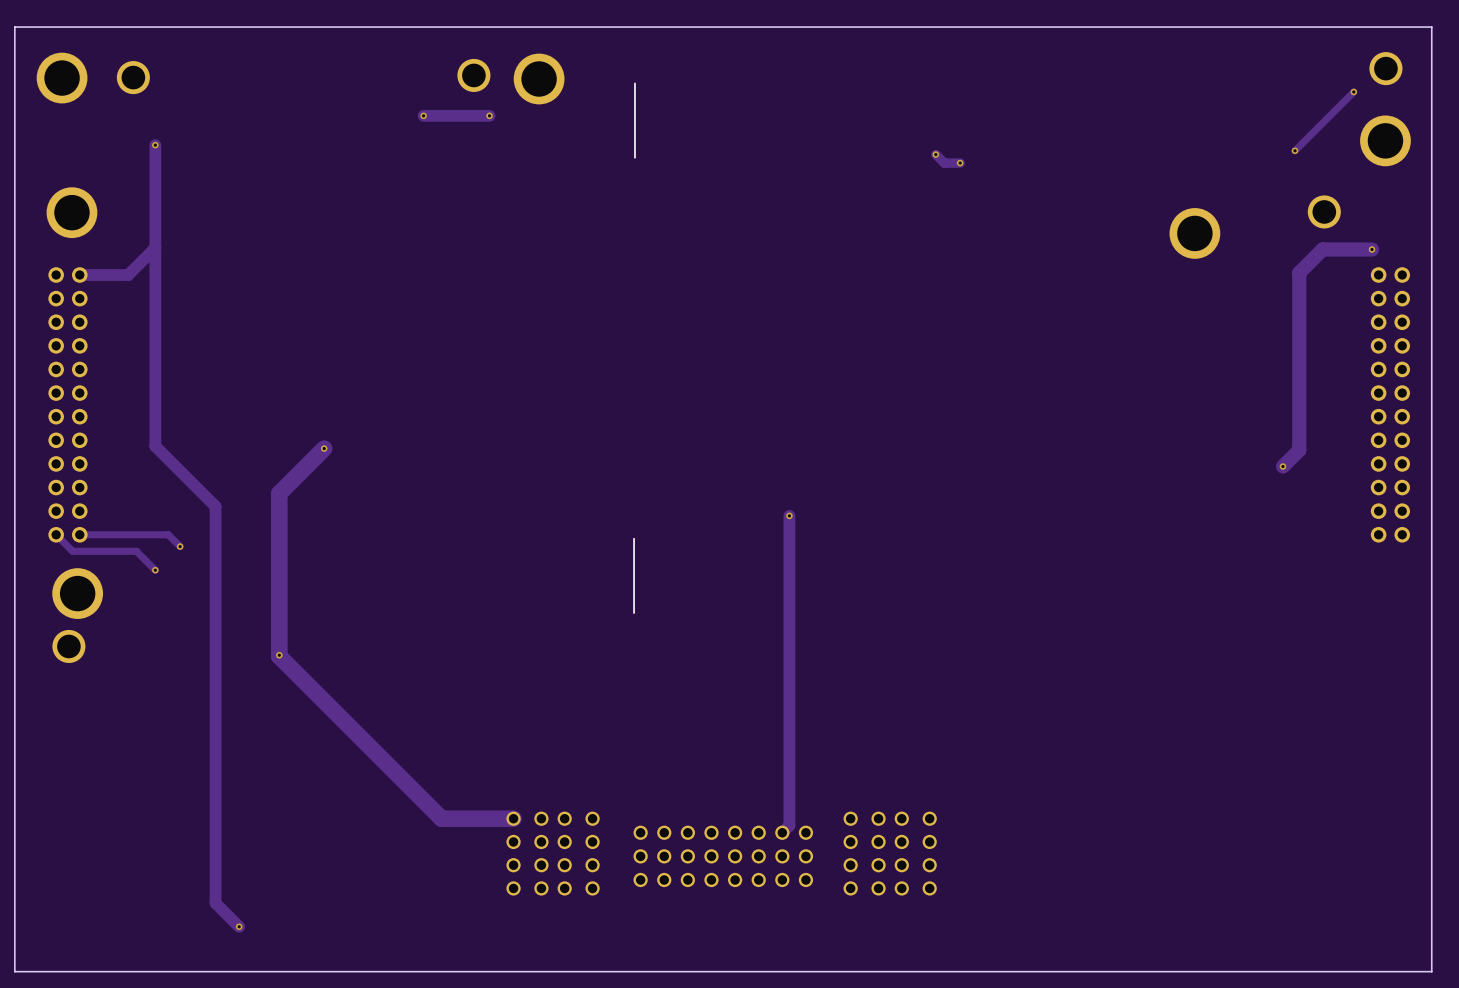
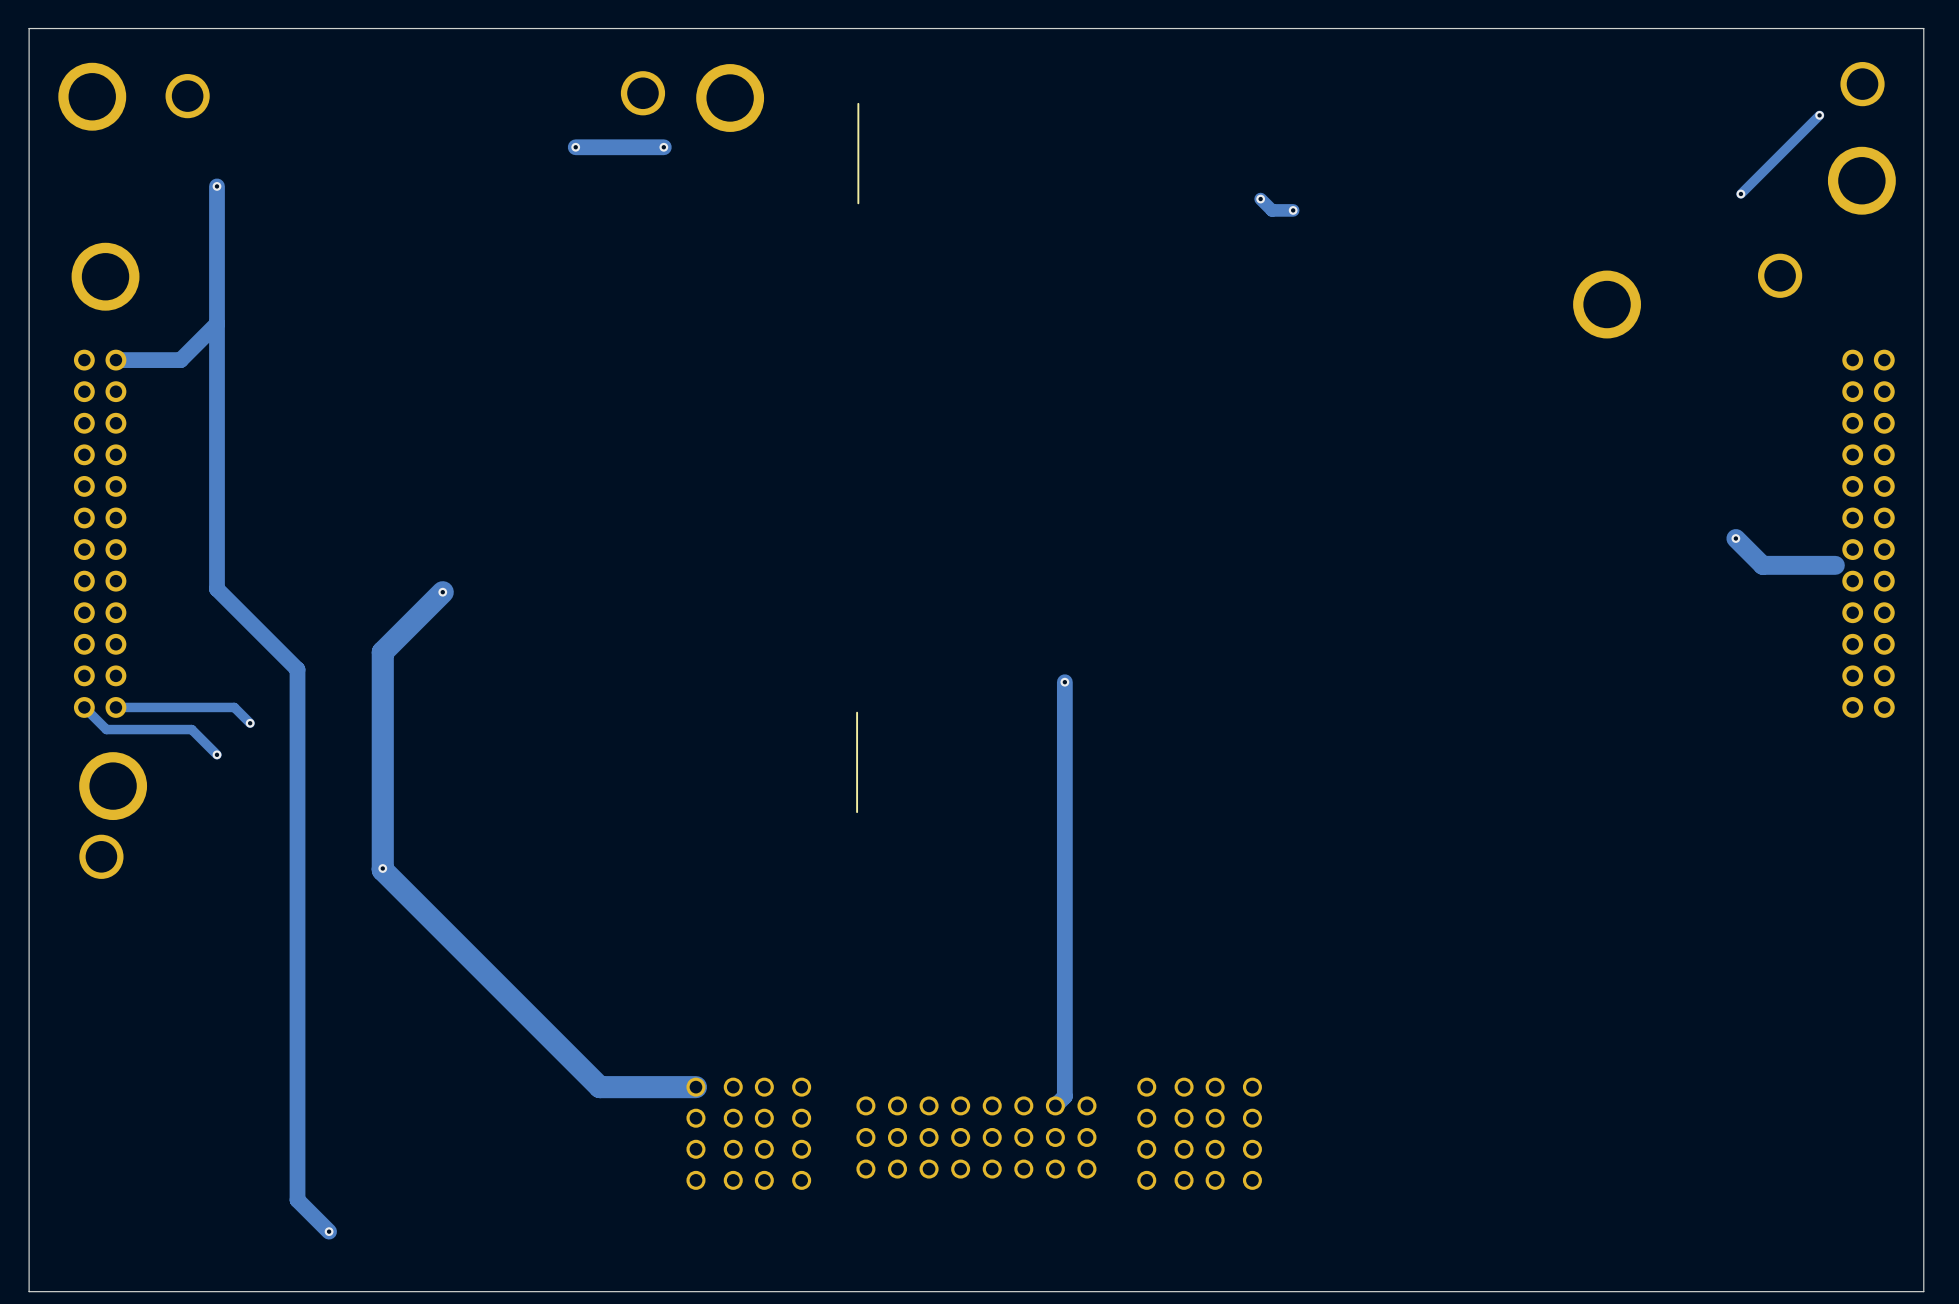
track: (1372, 249) (1322, 249) (1299, 272) (1299, 450) (1282, 466) -> none
via: (1372, 249) -> none
track: none -> (1735, 538) (1762, 565) (1835, 565)
via: none -> (1735, 538)
via: (1282, 466) -> none

